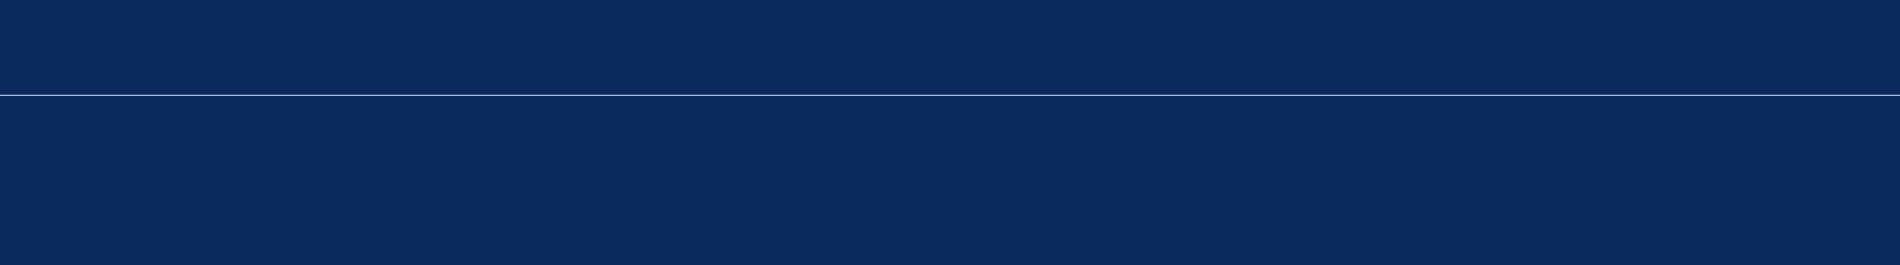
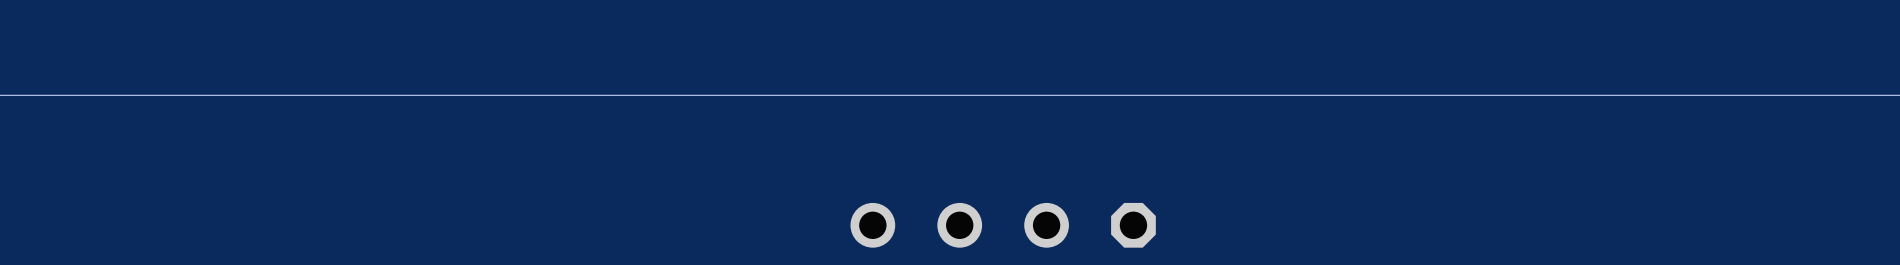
part: none -> (1003, 225)

